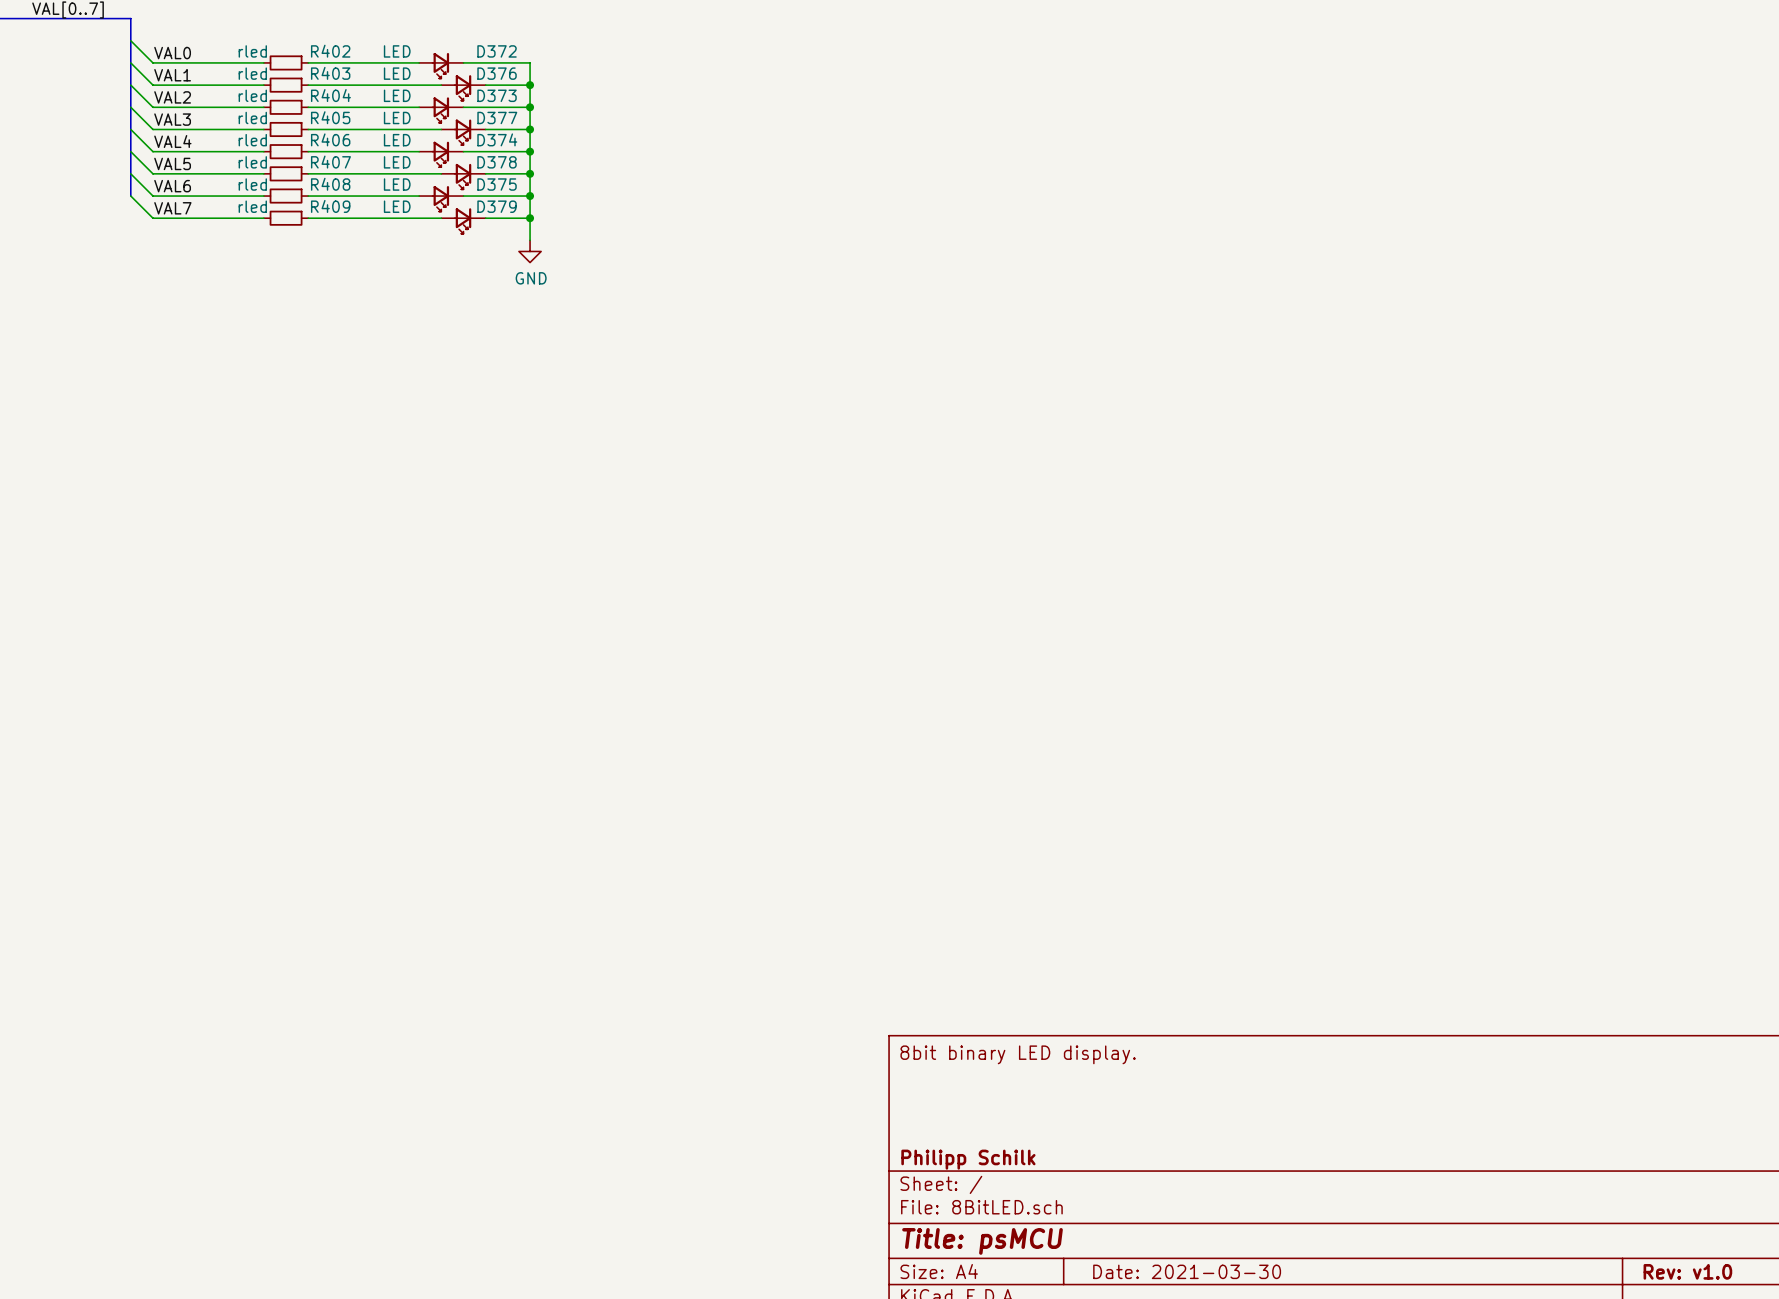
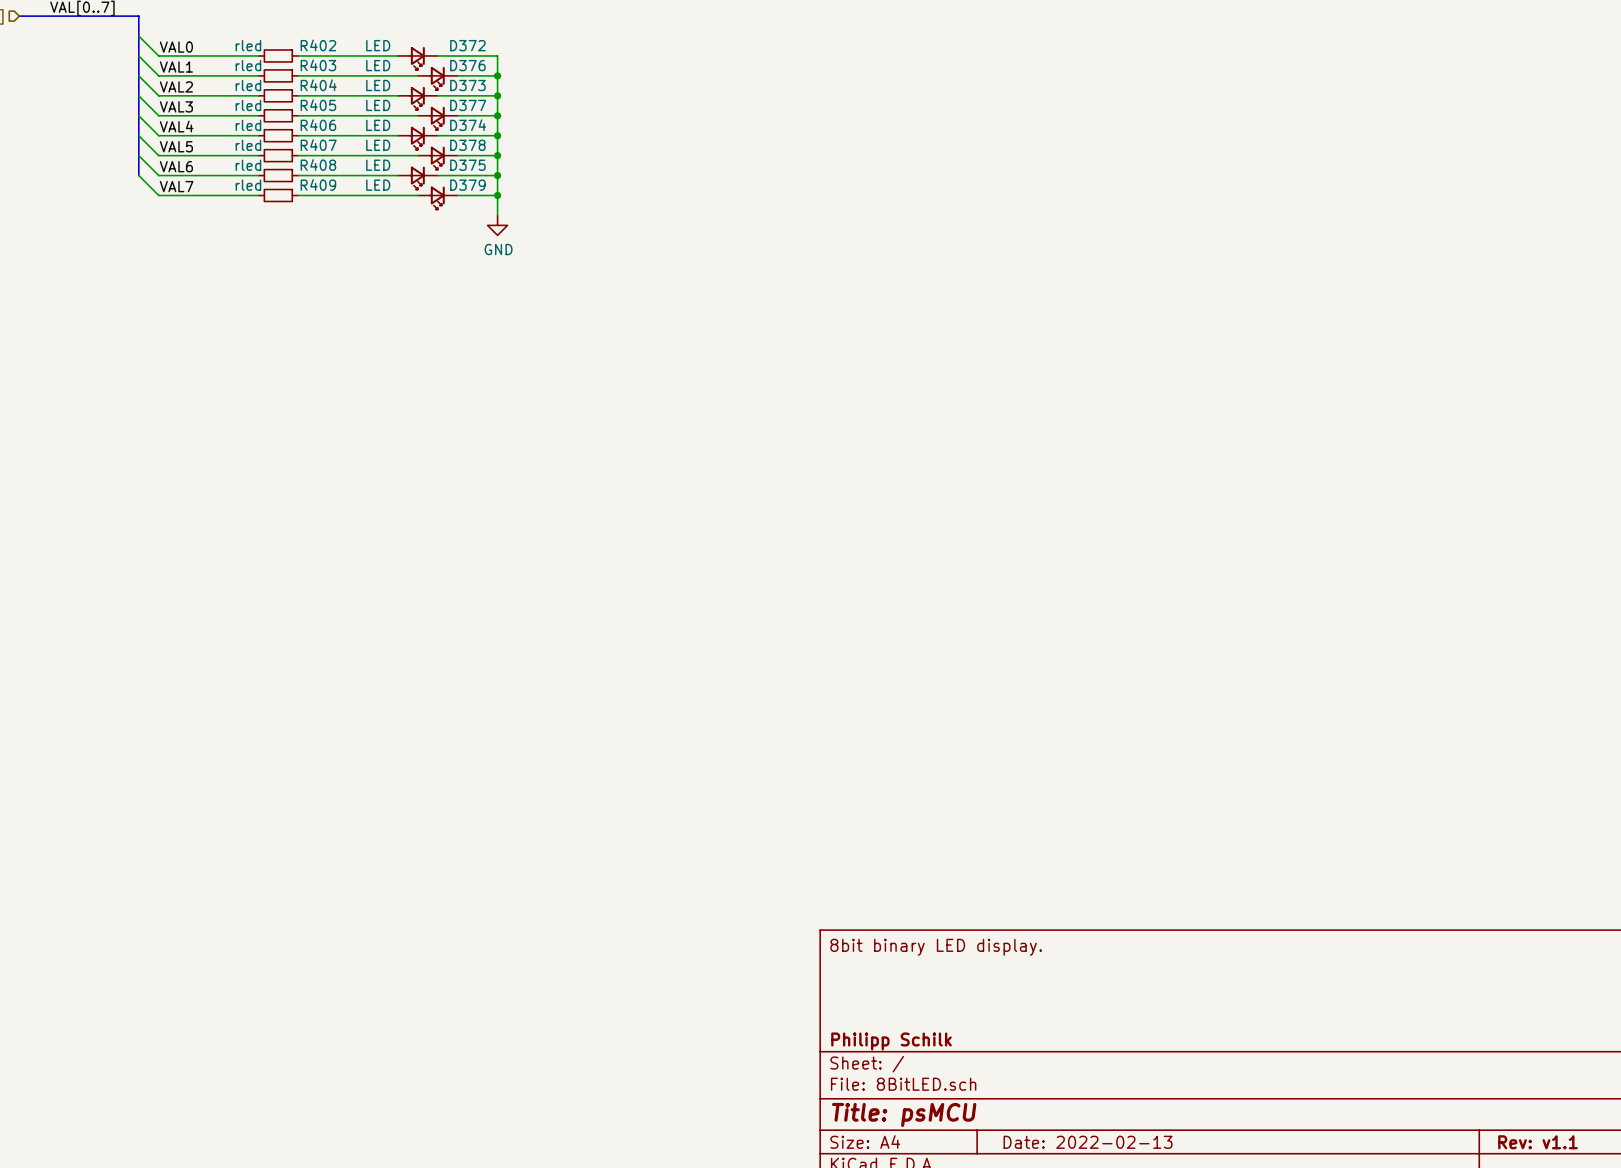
title block: Date: 2021-03-30 (1187, 1271) -> Date: 2022-02-13 (1088, 1142)
title block: Rev: v1.0 (1687, 1271) -> Rev: v1.1 (1538, 1142)

